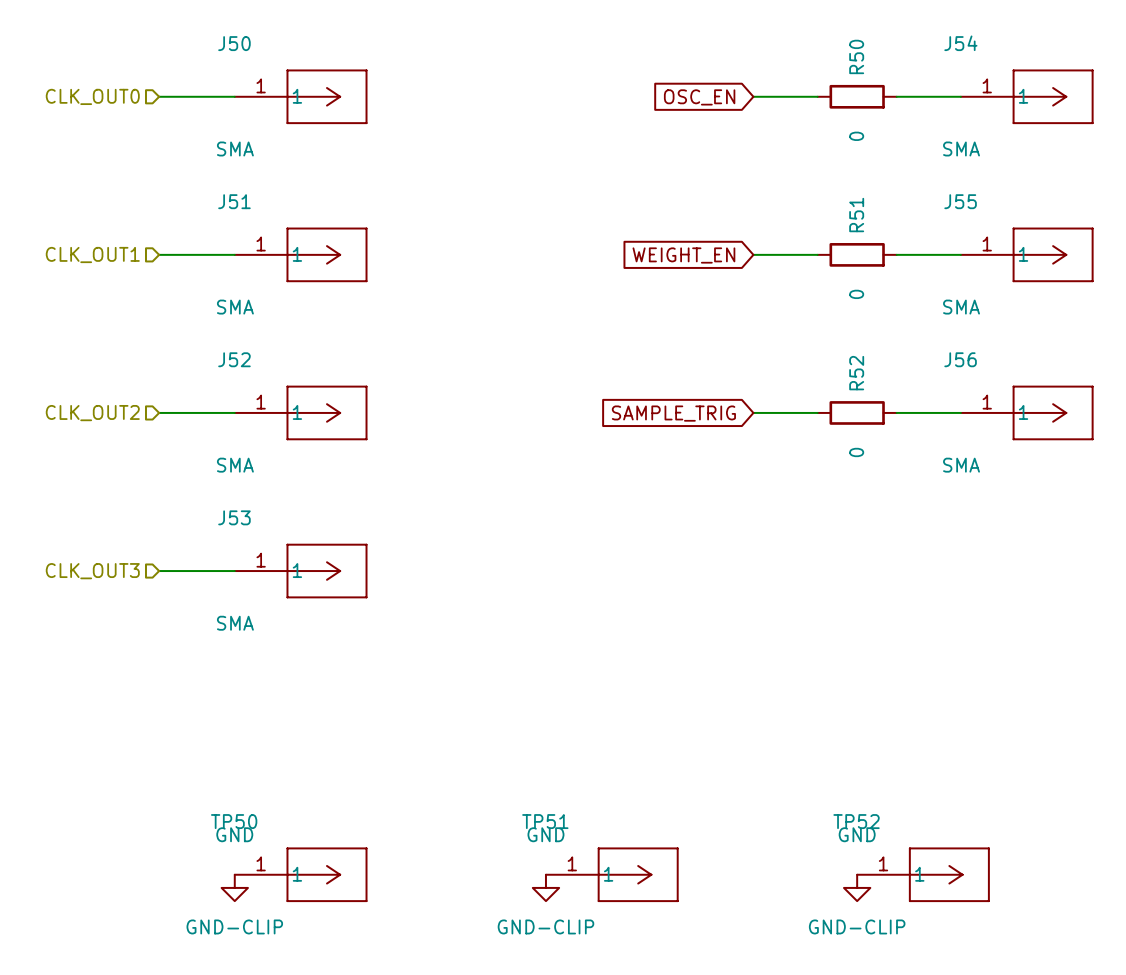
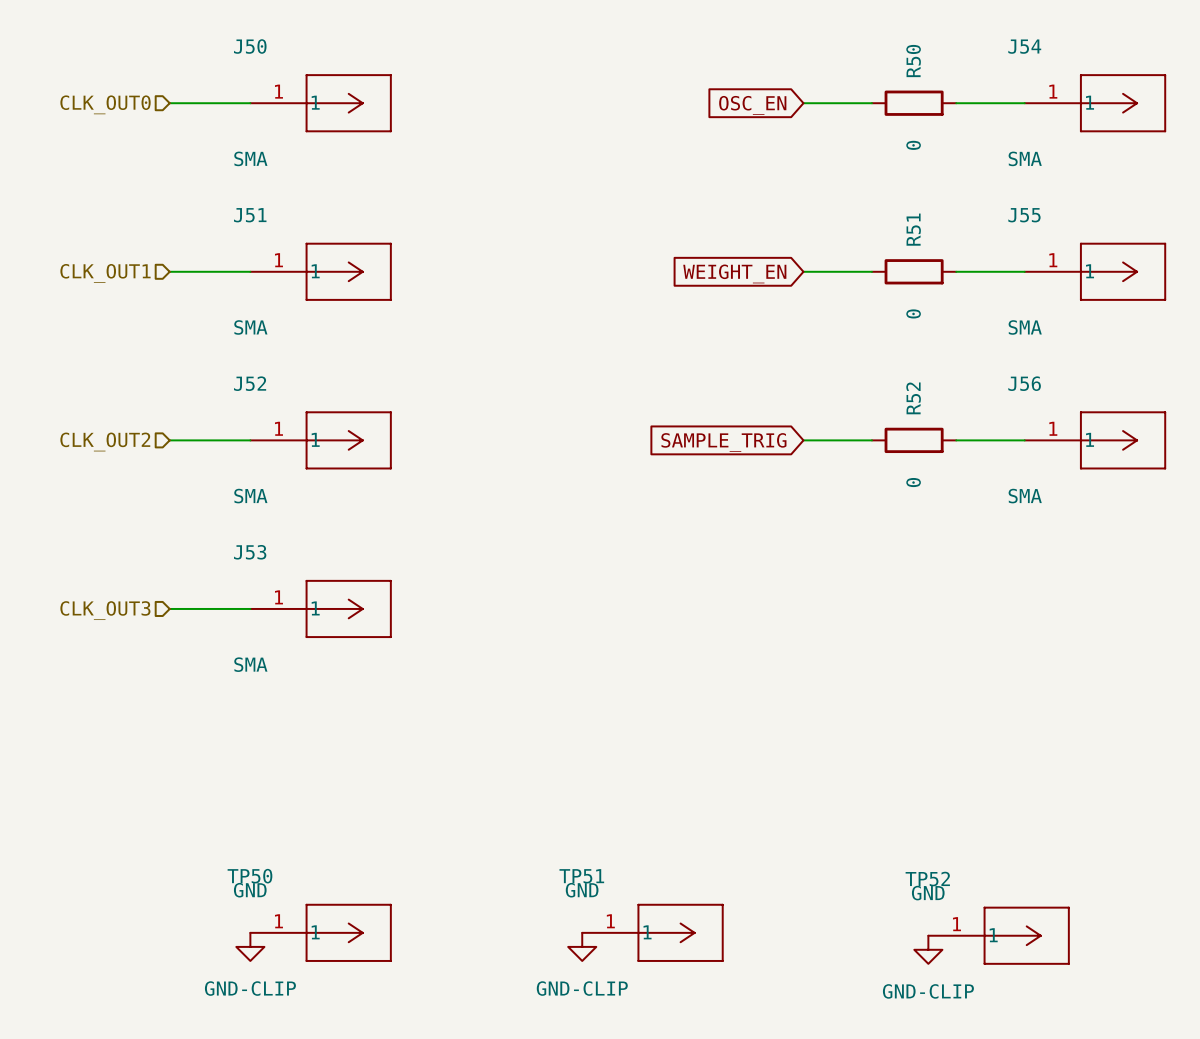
TP52 position: (923, 874) -> (998, 935)
power symbol position: GND (857, 887) -> GND (928, 949)

